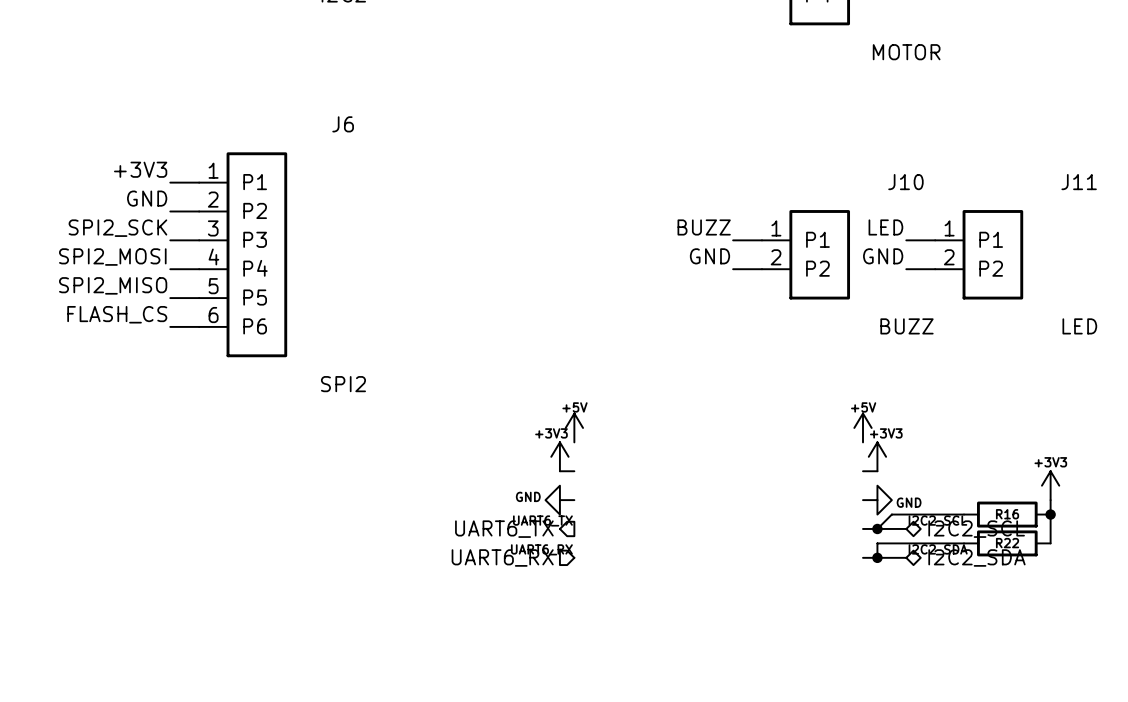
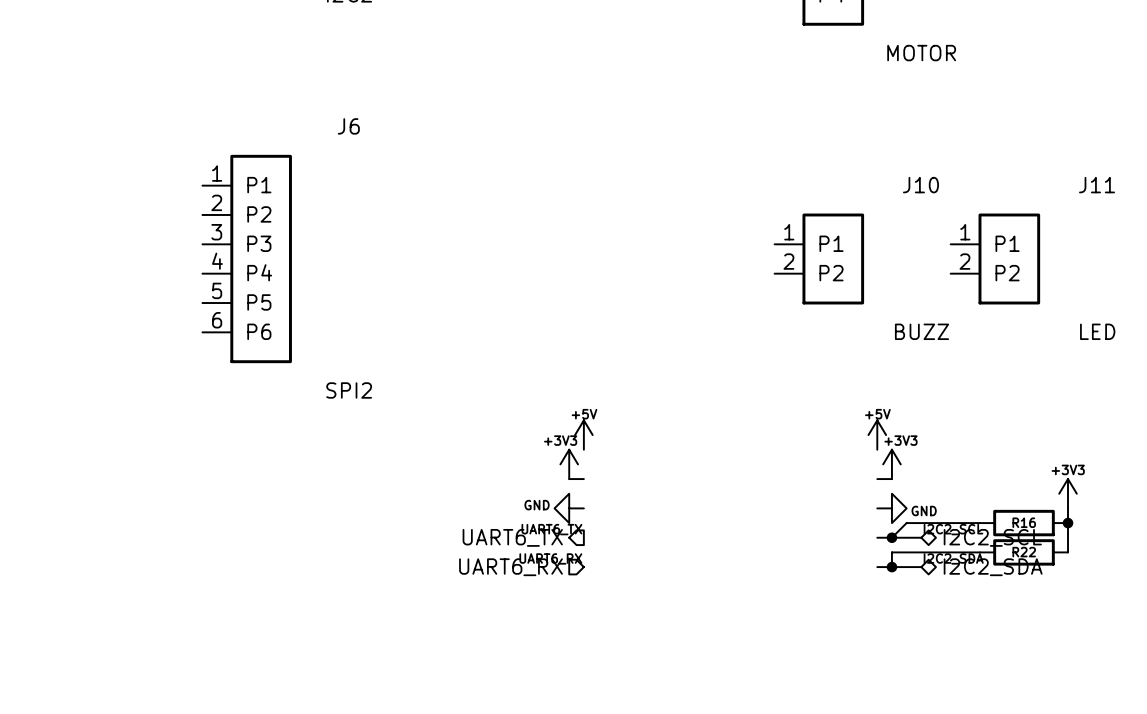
label: +3V3 (140, 169) -> none
wire: (170, 182) (199, 182) -> none
label: GND (147, 198) -> none
wire: (170, 211) (199, 211) -> none
label: BUZZ (704, 227) -> none
label: LED (885, 227) -> none
label: SPI2_SCK (117, 228) -> none
wire: (170, 240) (199, 240) -> none
wire: (733, 240) (761, 240) -> none
wire: (906, 240) (935, 240) -> none
label: GND (709, 256) -> none
label: GND (883, 256) -> none
label: SPI2_MOSI (112, 257) -> none
wire: (170, 269) (199, 269) -> none
wire: (733, 269) (761, 269) -> none
wire: (906, 269) (935, 269) -> none
label: SPI2_MISO (113, 285) -> none
wire: (170, 298) (199, 298) -> none
label: FLASH_CS (117, 314) -> none
wire: (170, 326) (199, 326) -> none

